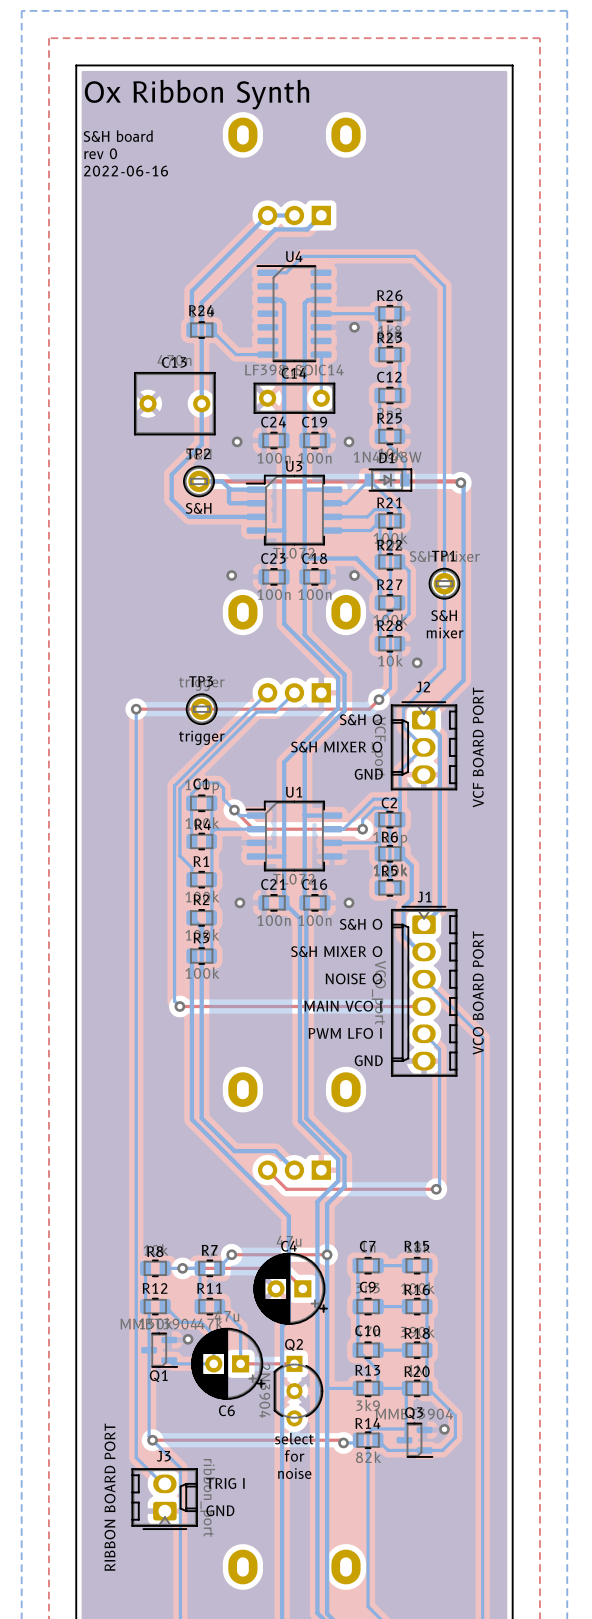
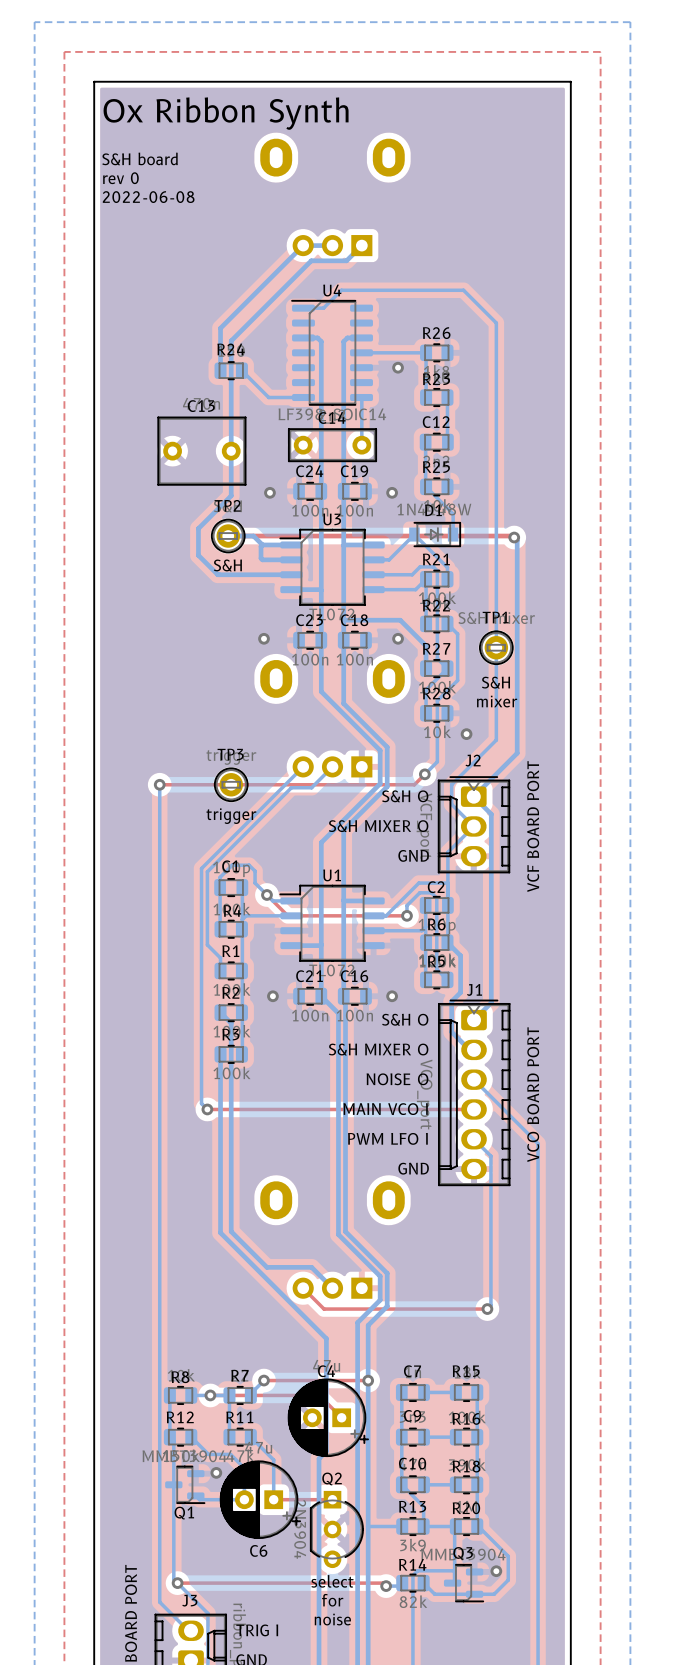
text: 2022-06-16 (126, 171) -> 2022-06-08 (148, 197)

